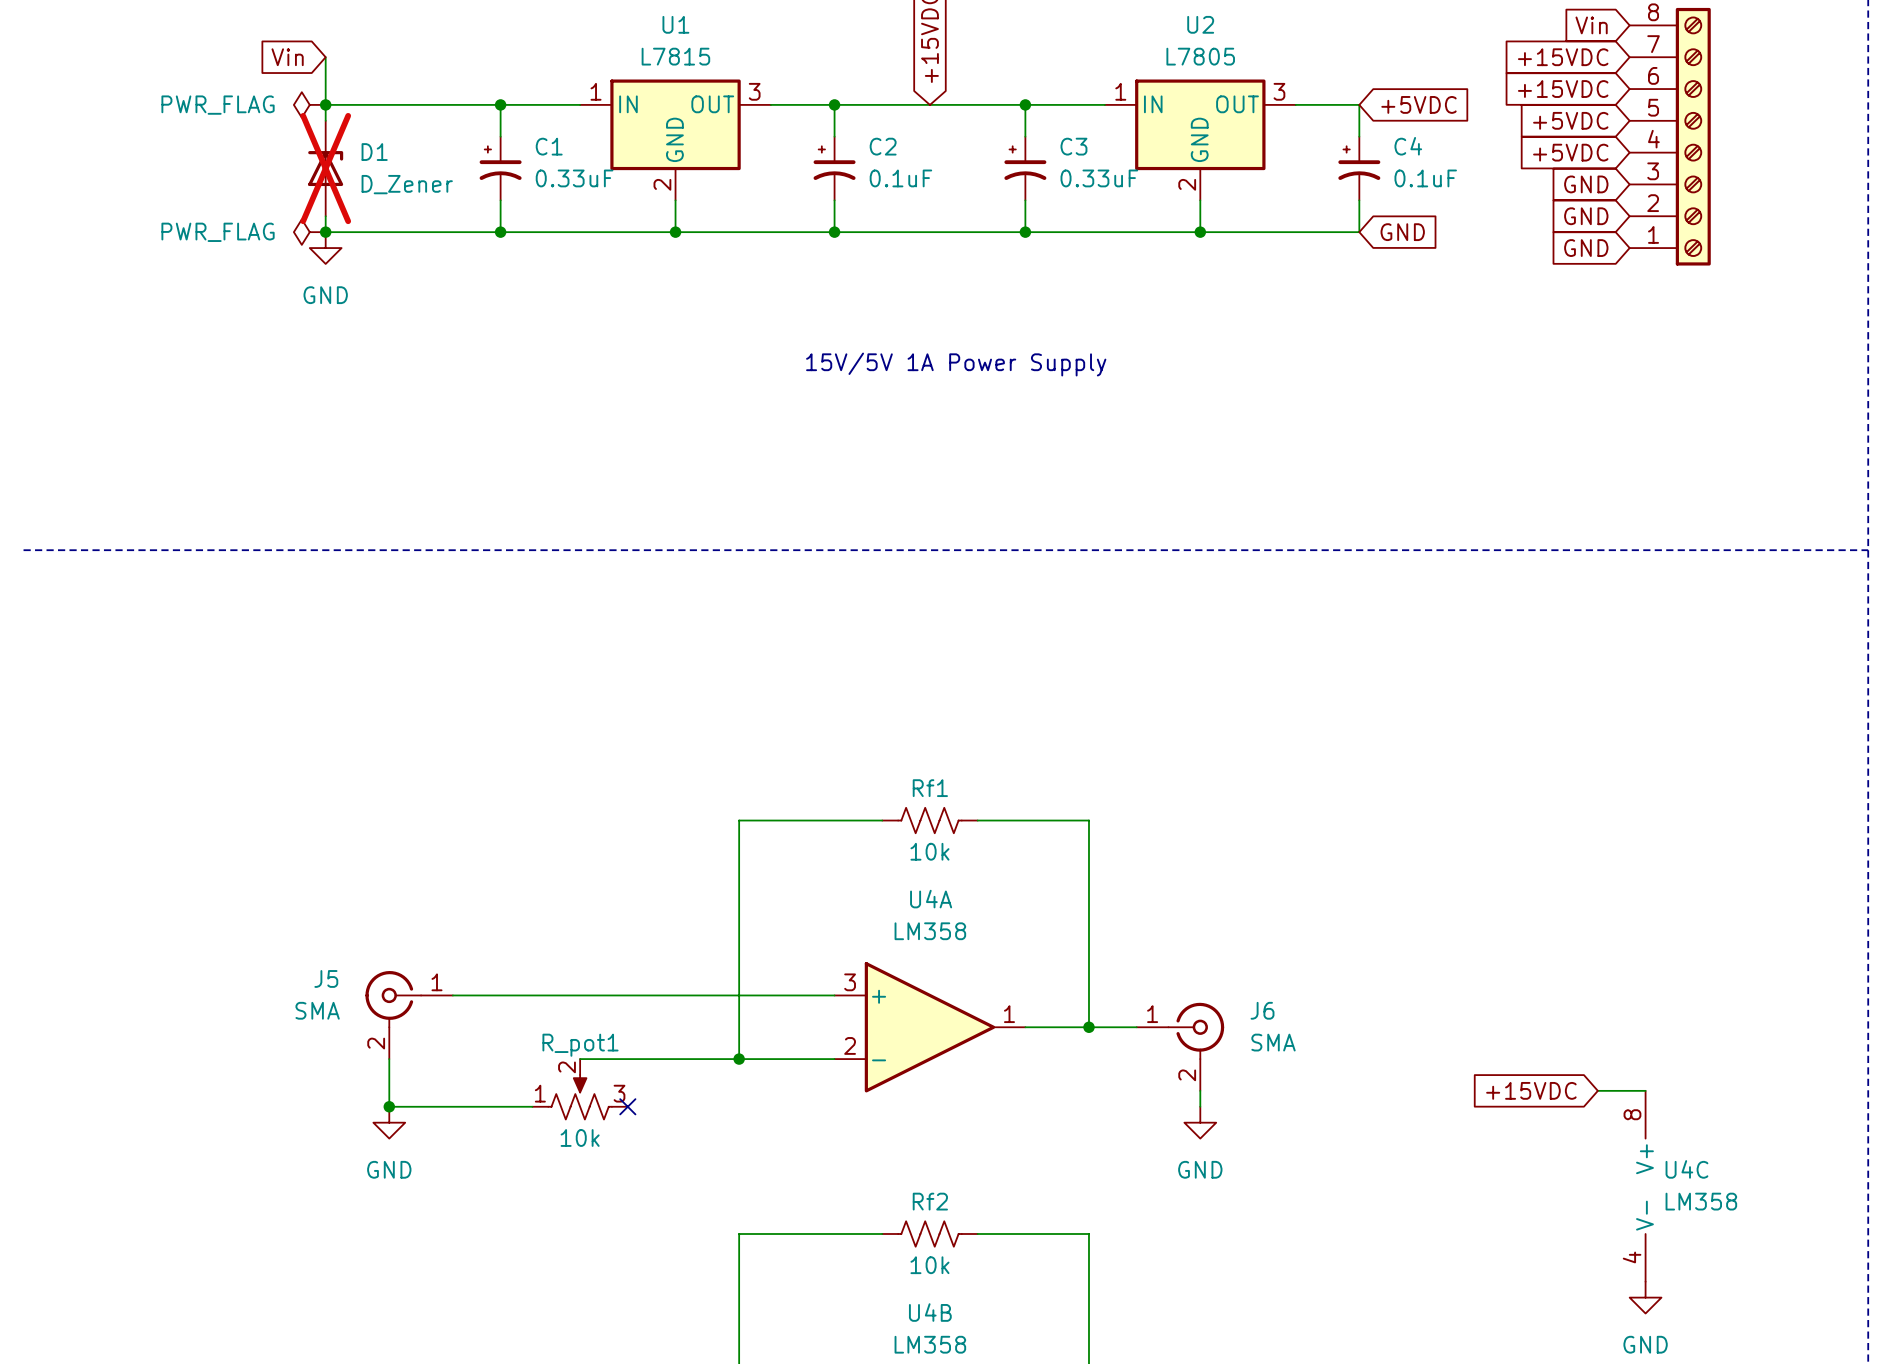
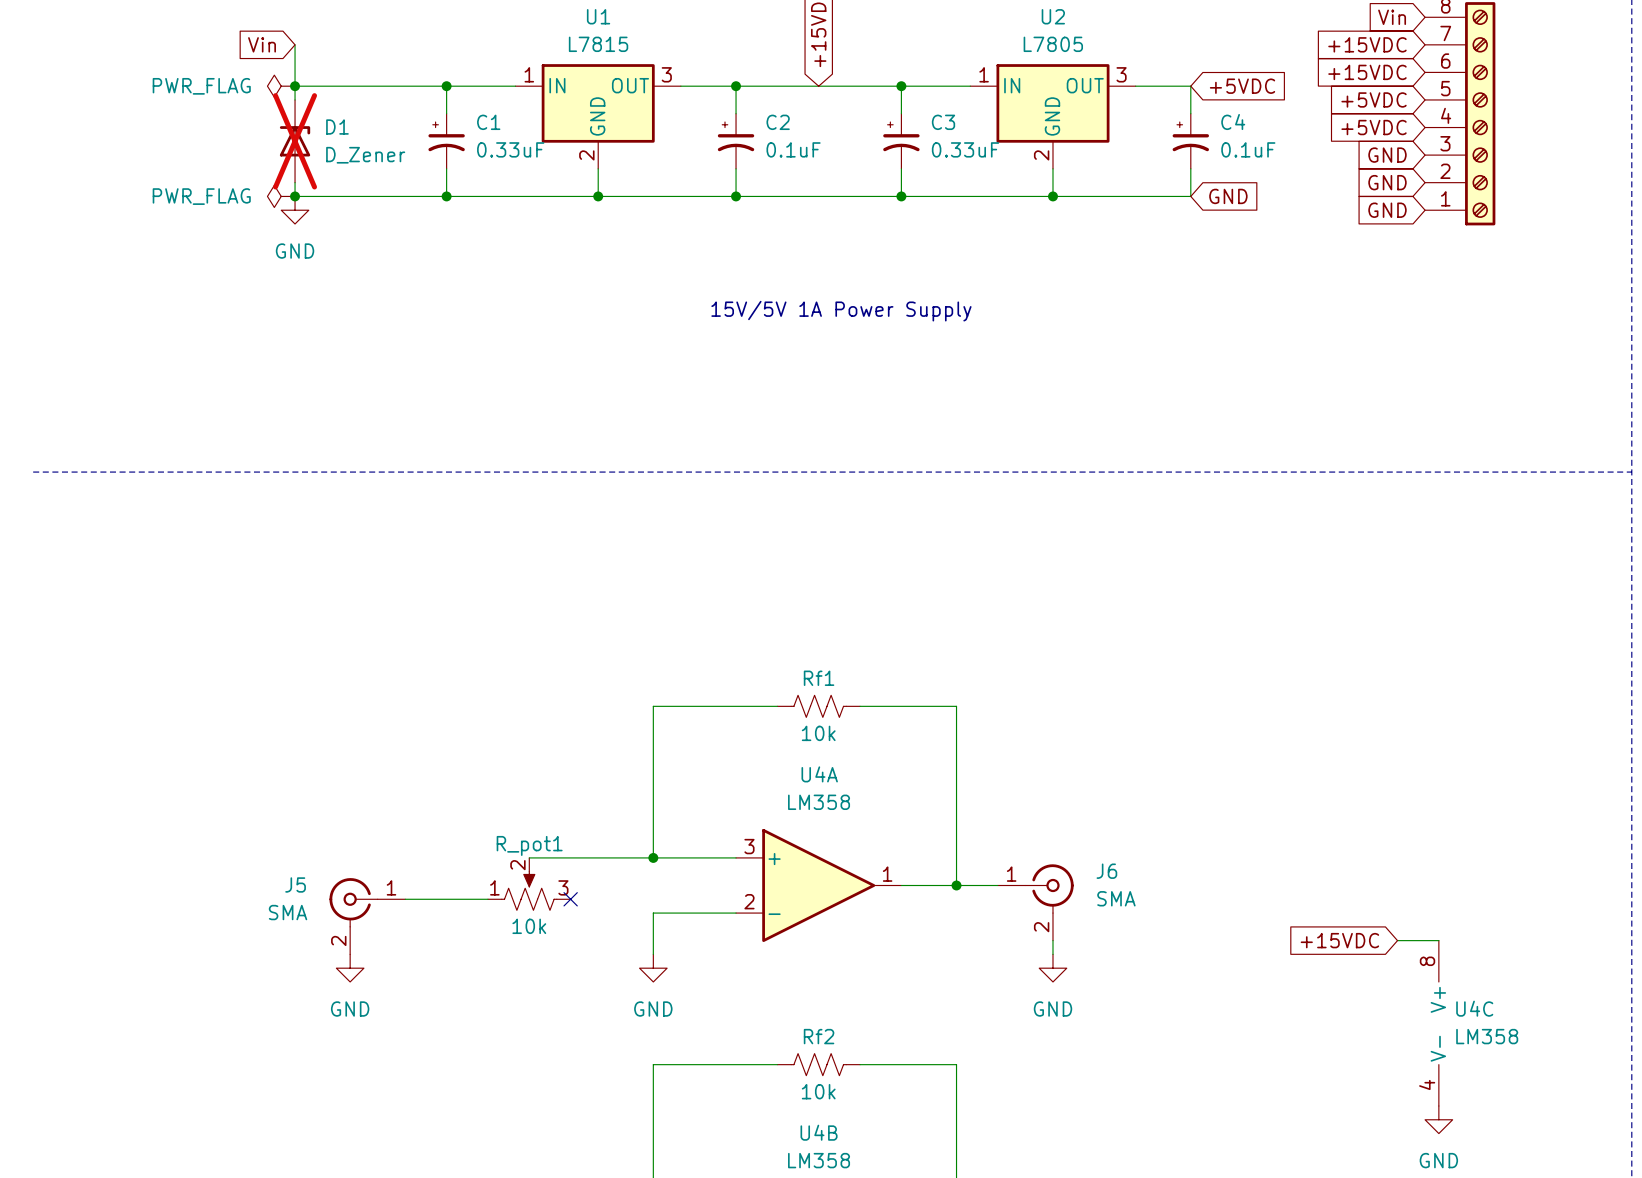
wire: (452, 995) (596, 995) -> none
wire: (739, 995) (739, 1059) (580, 1059) -> none
J5 position: (409, 1015) -> (367, 916)
wire: none -> (405, 899) (487, 899)
wire: (389, 1059) (389, 1106) (532, 1106) -> none
wire: none -> (653, 913) (653, 954)
junction position: (739, 1059) -> (653, 857)
R_pot1 position: (580, 1089) -> (529, 884)
junction: (389, 1106) -> none
no-connect mark position: (627, 1106) -> (570, 899)
power symbol: none -> GND (653, 968)

